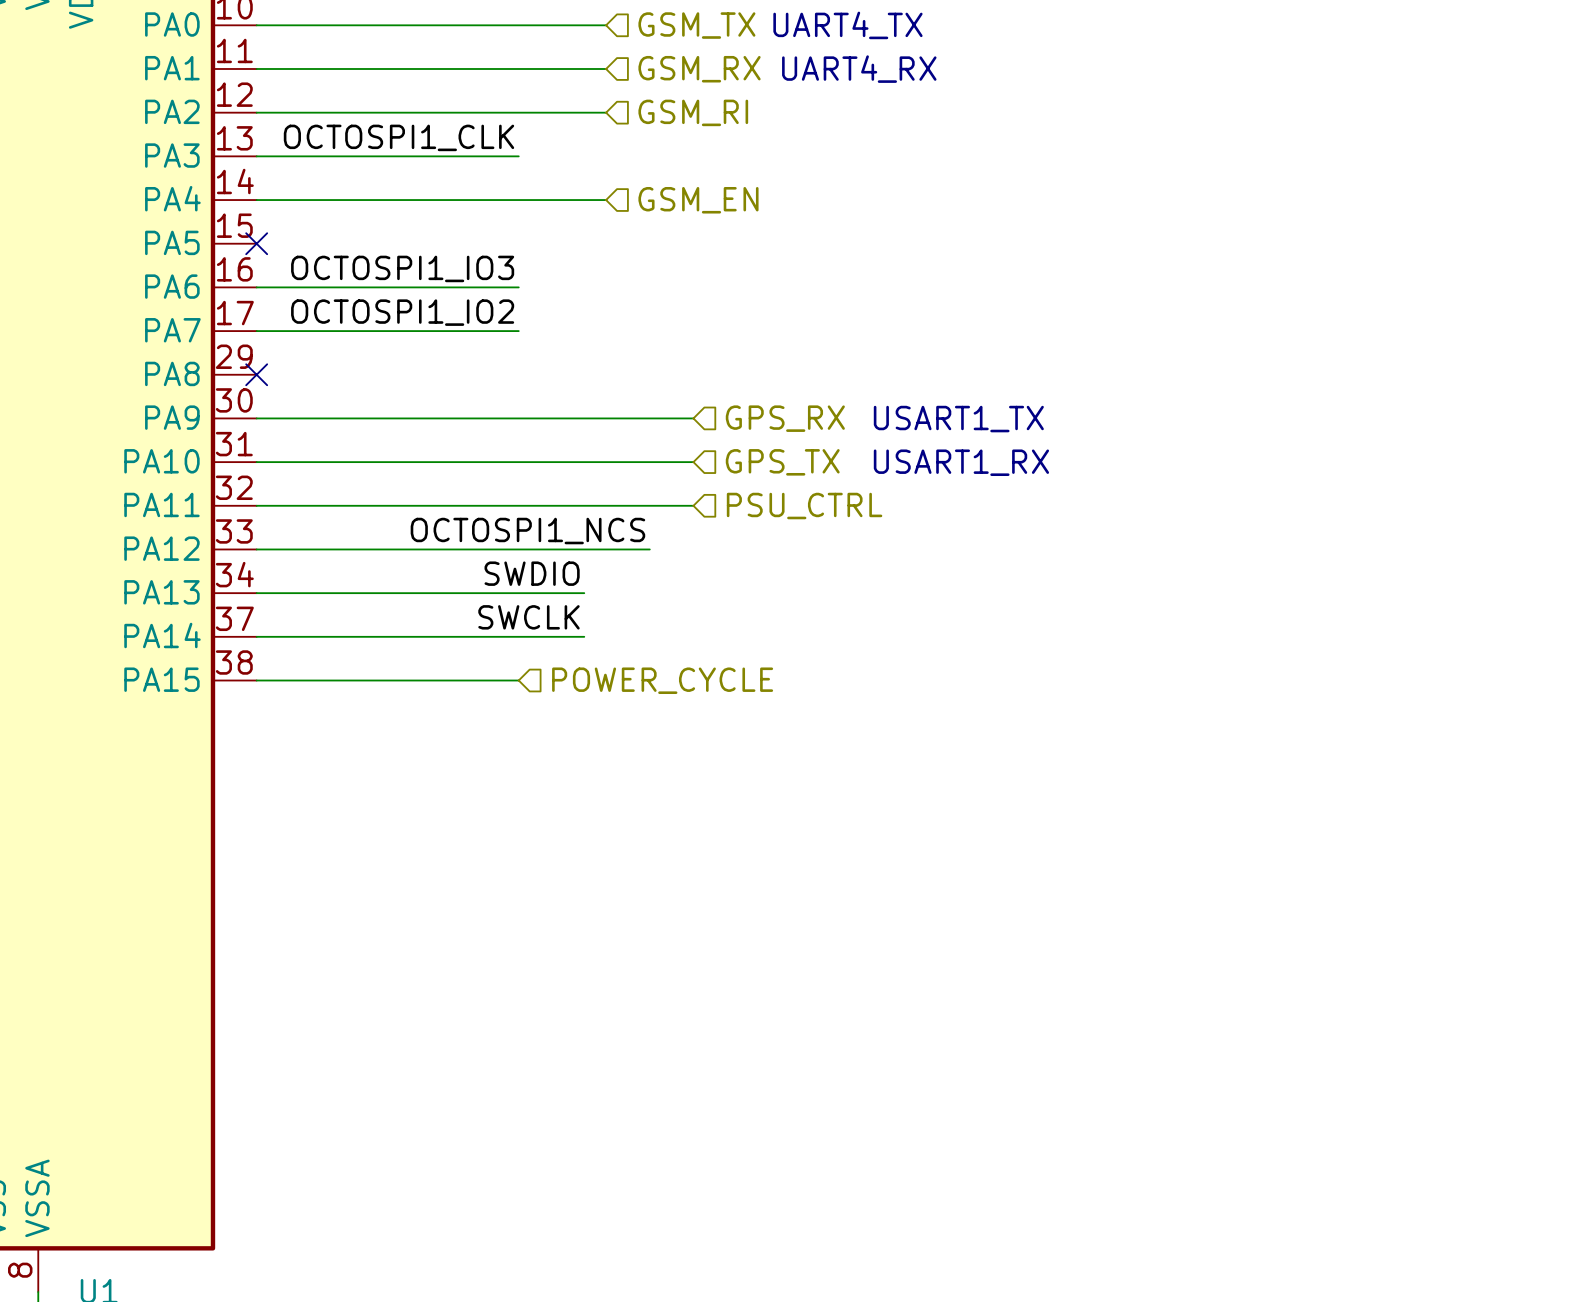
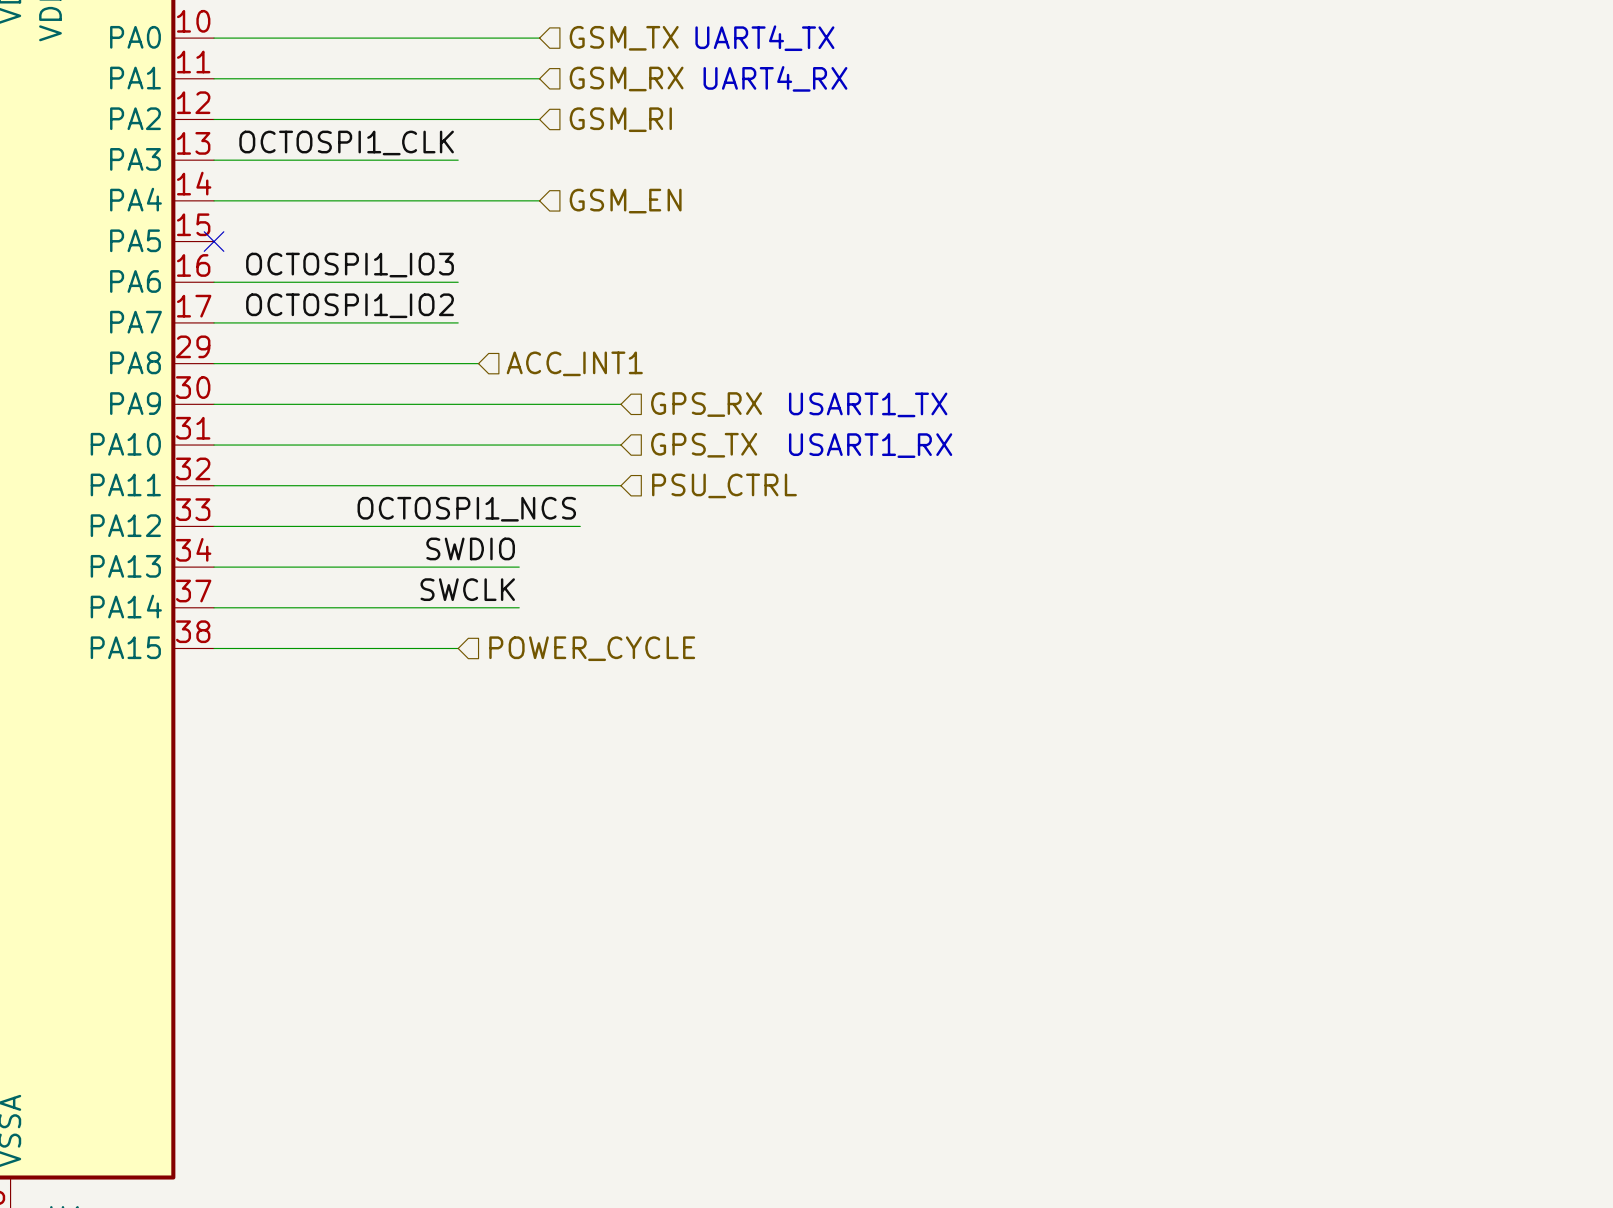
wire: none -> (214, 363) (478, 363)
no-connect mark: (256, 374) -> none
hierarchical label: none -> ACC_INT1 (574, 363)

